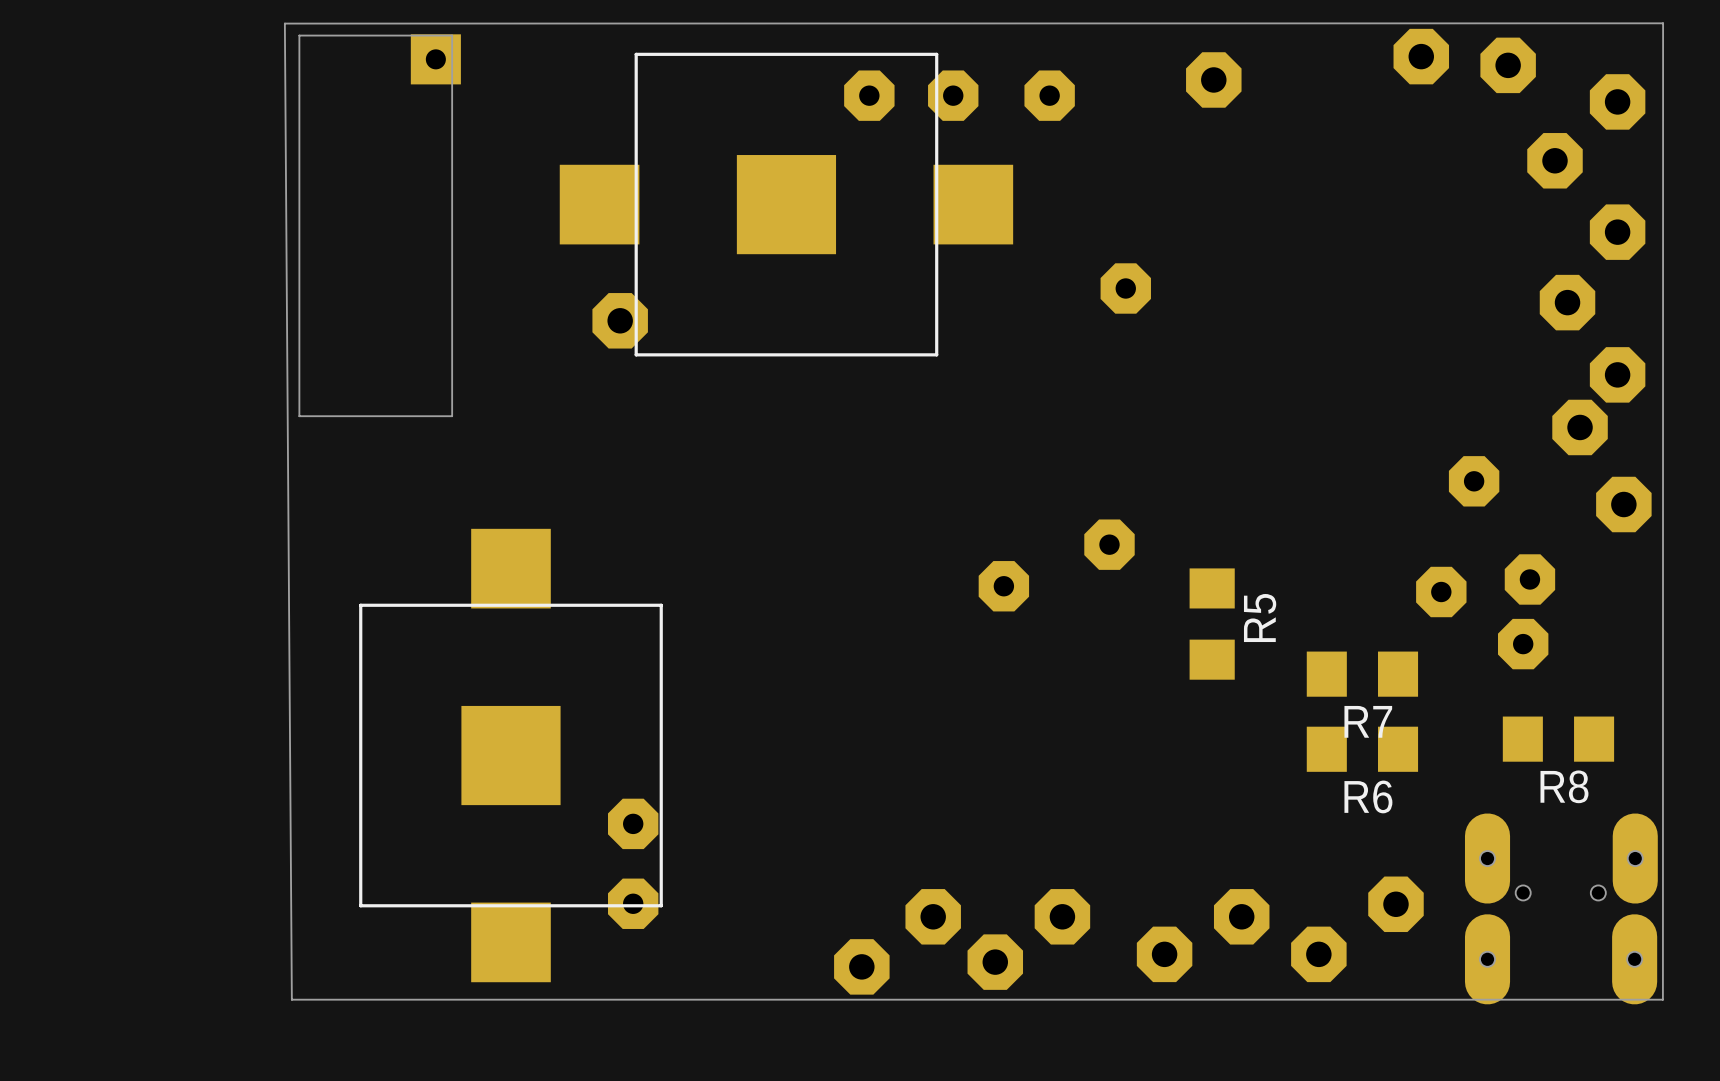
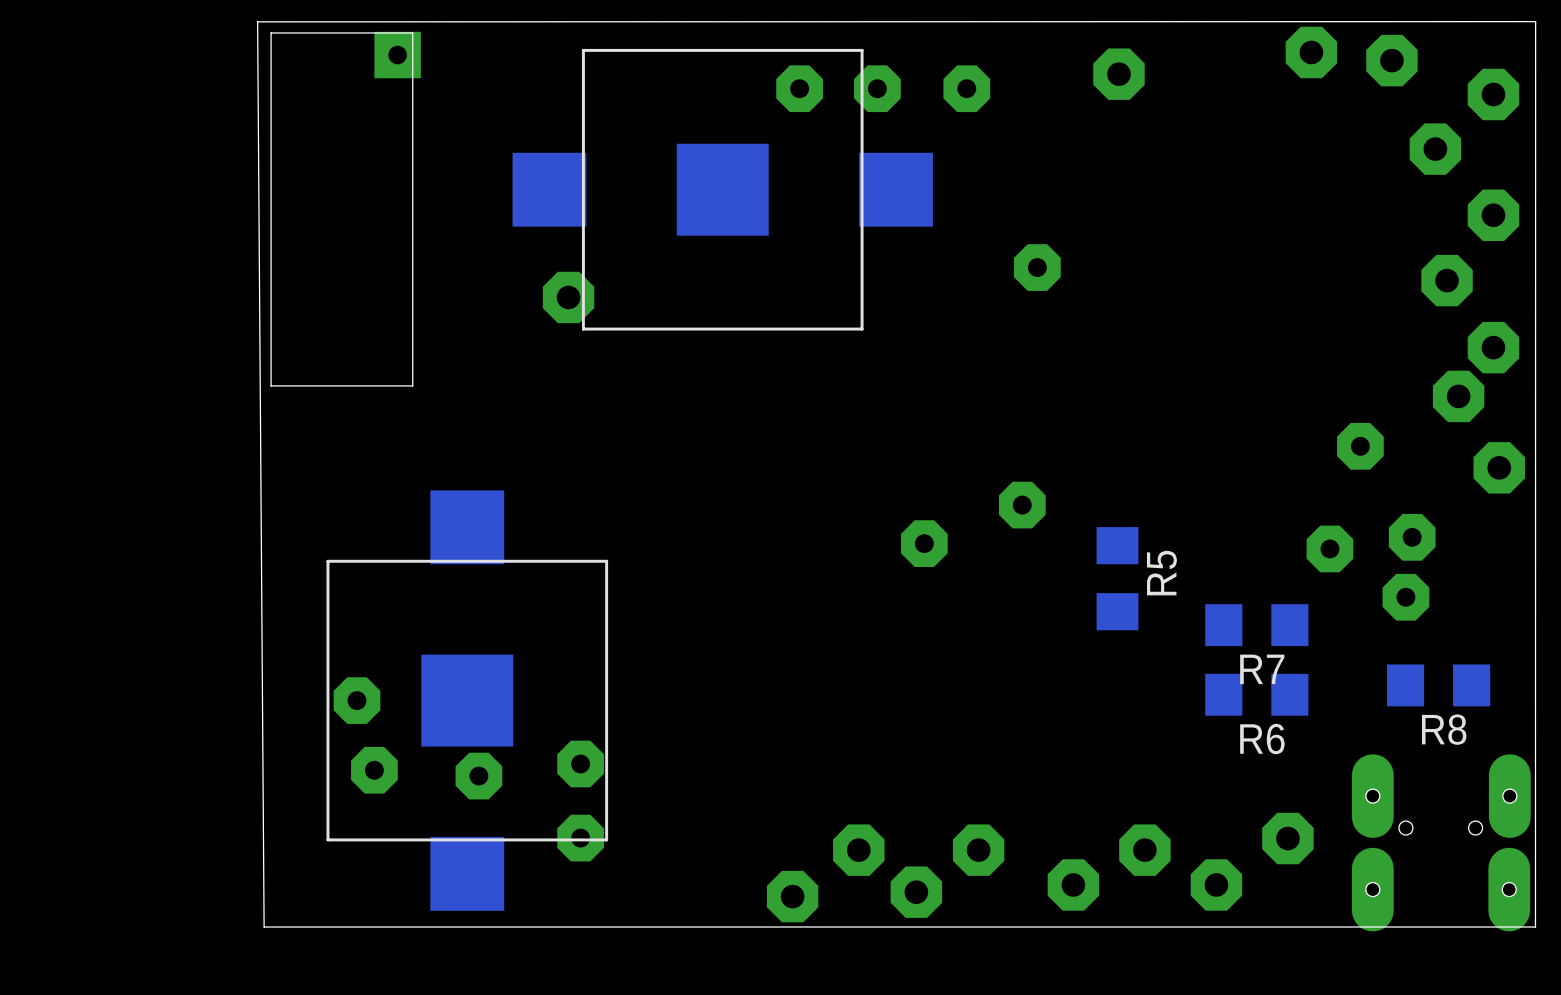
part: none -> (356, 700)
part: none -> (374, 770)
part: none -> (478, 776)

